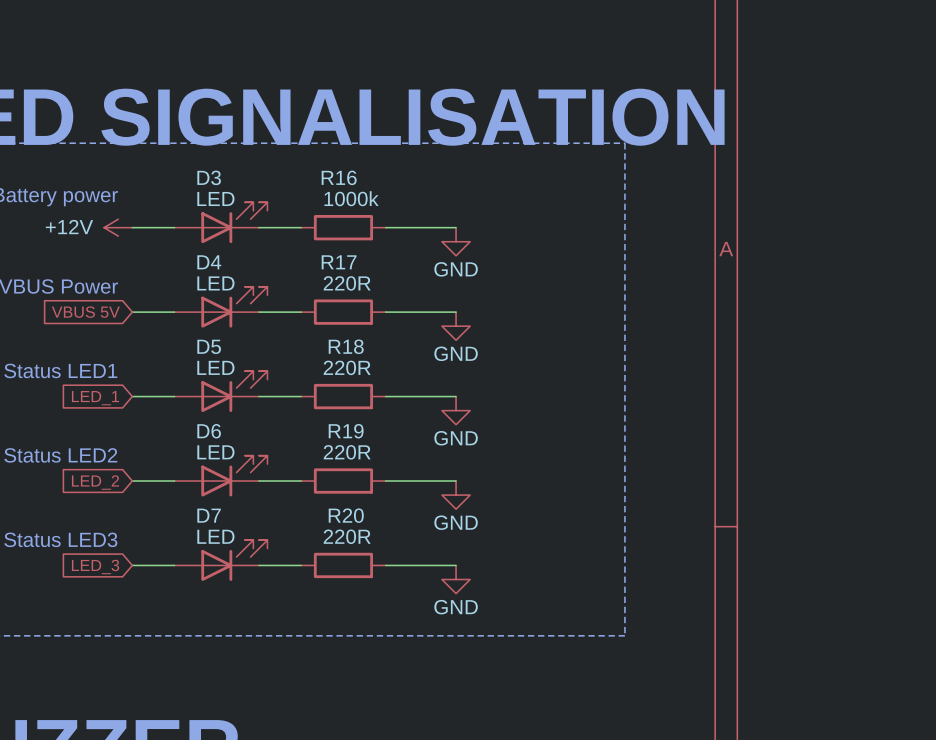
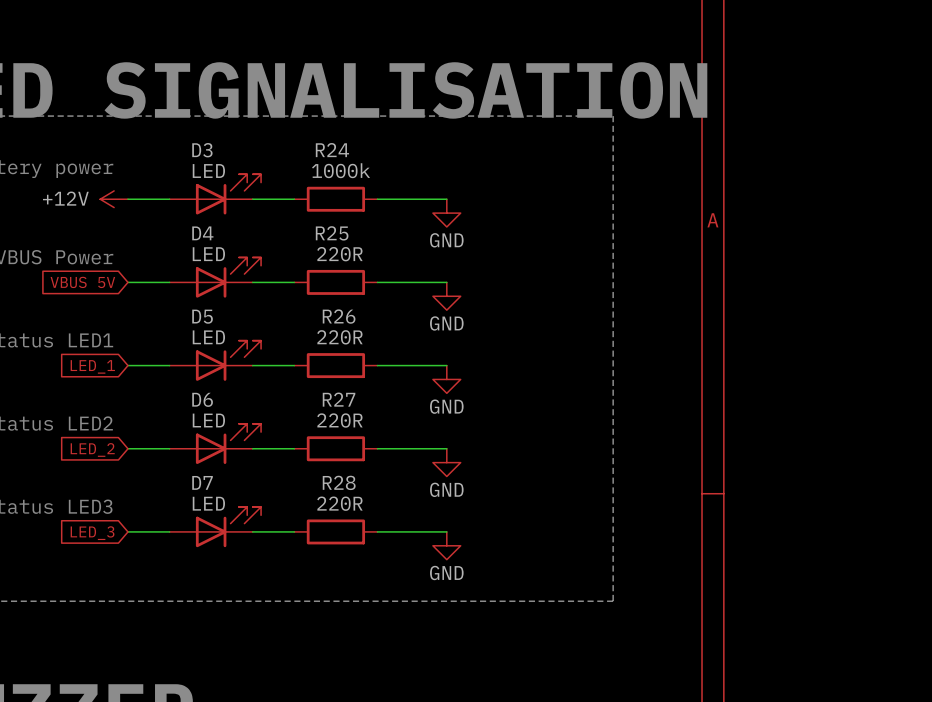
R16 name: R16 (339, 177) -> R24 (332, 150)
R17 name: R17 (339, 262) -> R25 (332, 233)
R18 name: R18 (346, 346) -> R26 (339, 316)
R19 name: R19 (346, 431) -> R27 (339, 399)
R20 name: R20 (346, 515) -> R28 (339, 482)

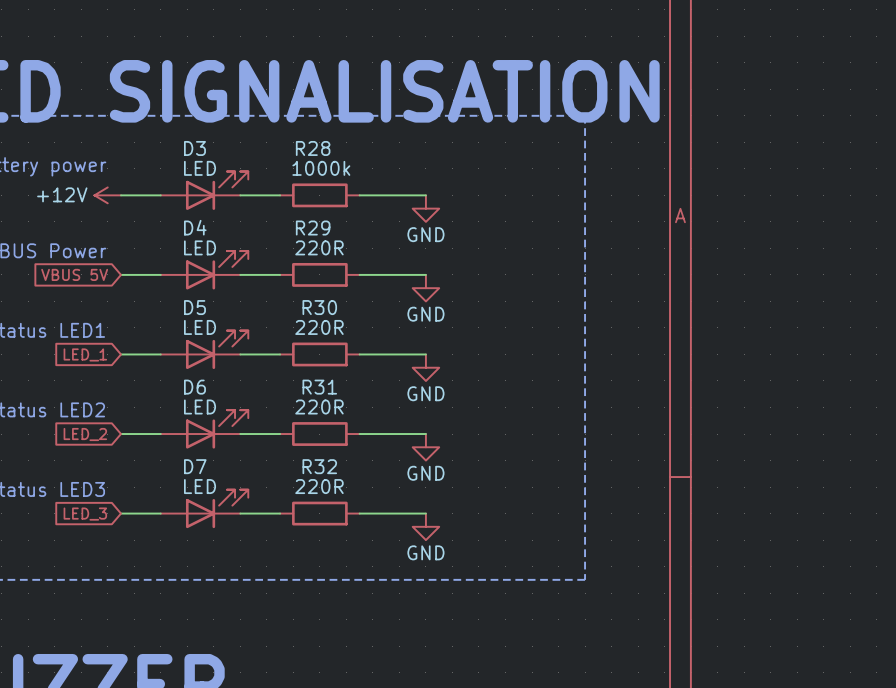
R24 name: R24 (332, 150) -> R28 (313, 148)
R25 name: R25 (332, 233) -> R29 (313, 228)
R26 name: R26 (339, 316) -> R30 (319, 307)
R27 name: R27 (339, 399) -> R31 (319, 387)
R28 name: R28 (339, 482) -> R32 (319, 466)

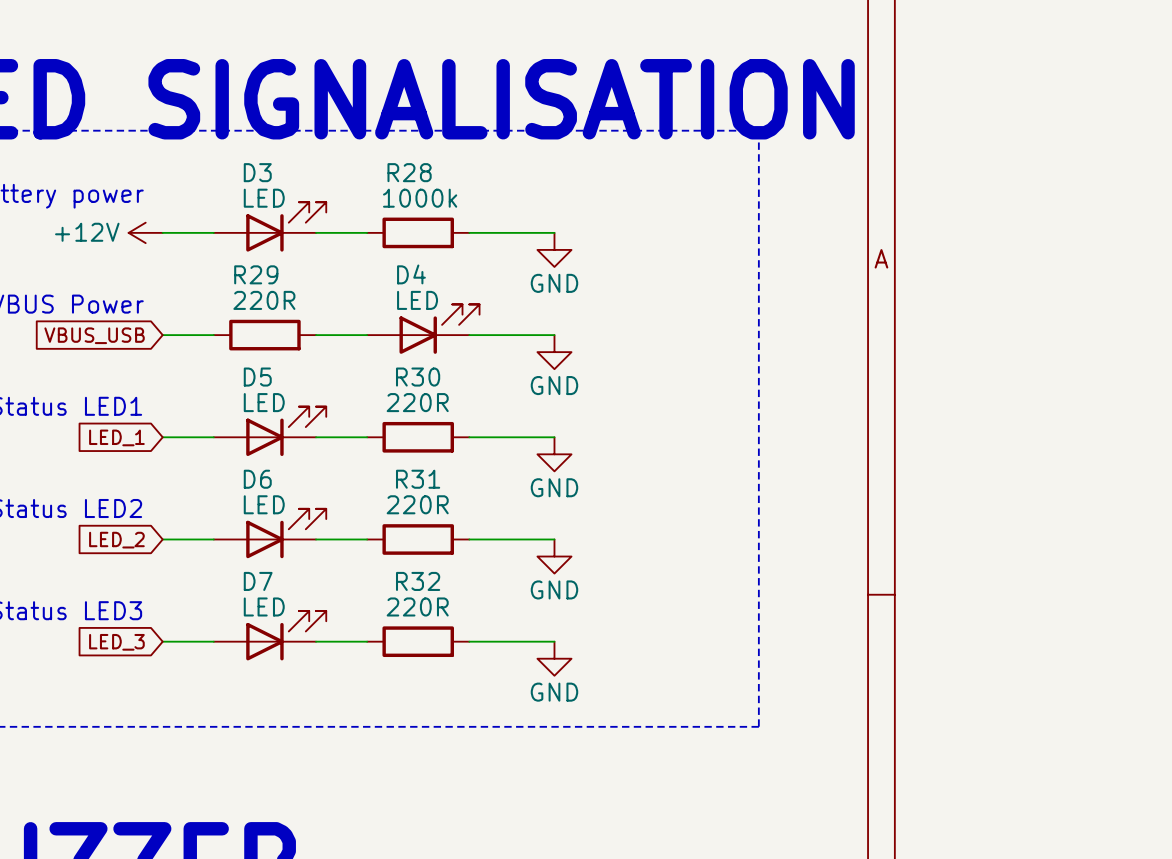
D4 position: (204, 270) -> (423, 329)
global label: VBUS 5V (74, 274) -> VBUS_USB (94, 335)
R29 position: (319, 274) -> (264, 335)

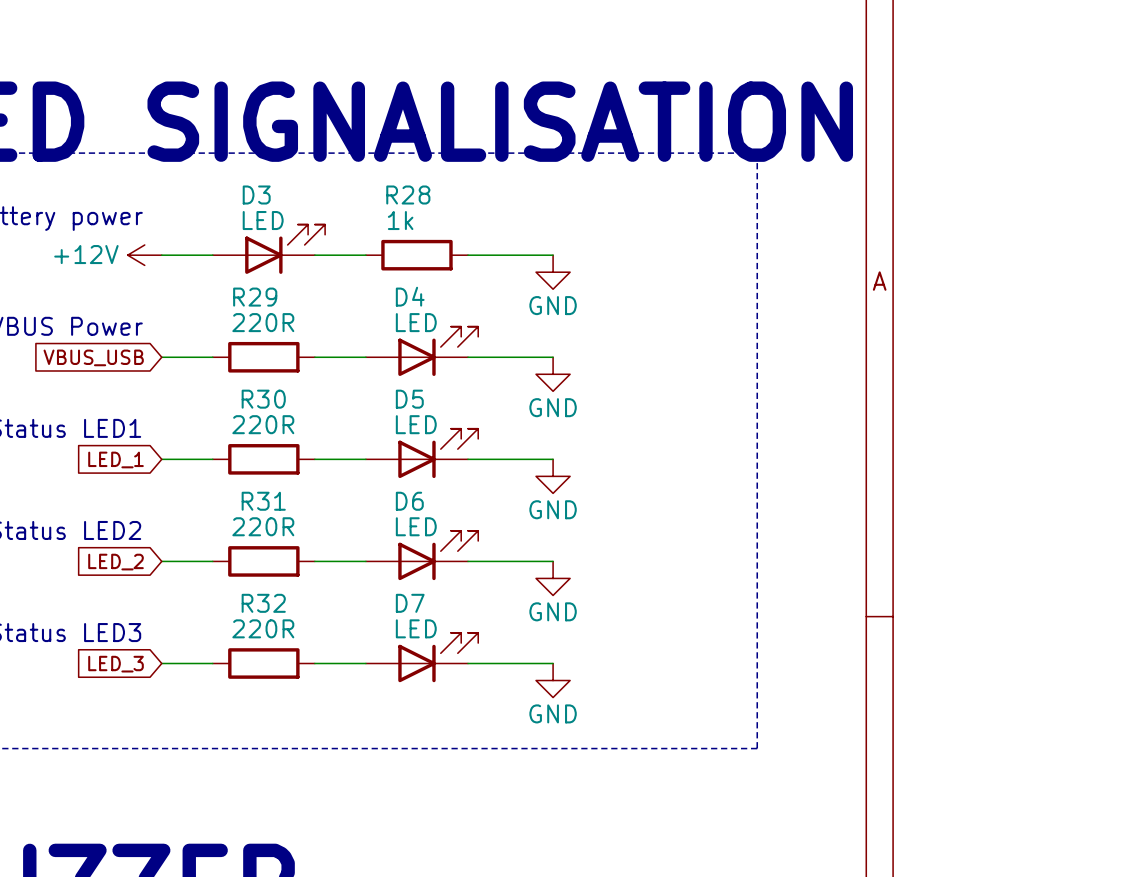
R28 value: 1000k (420, 198) -> 1k (400, 220)
D5 position: (270, 431) -> (422, 453)
R30 position: (418, 437) -> (263, 459)
D6 position: (270, 533) -> (422, 555)
R31 position: (418, 539) -> (263, 561)
D7 position: (270, 635) -> (422, 657)
R32 position: (418, 641) -> (263, 663)

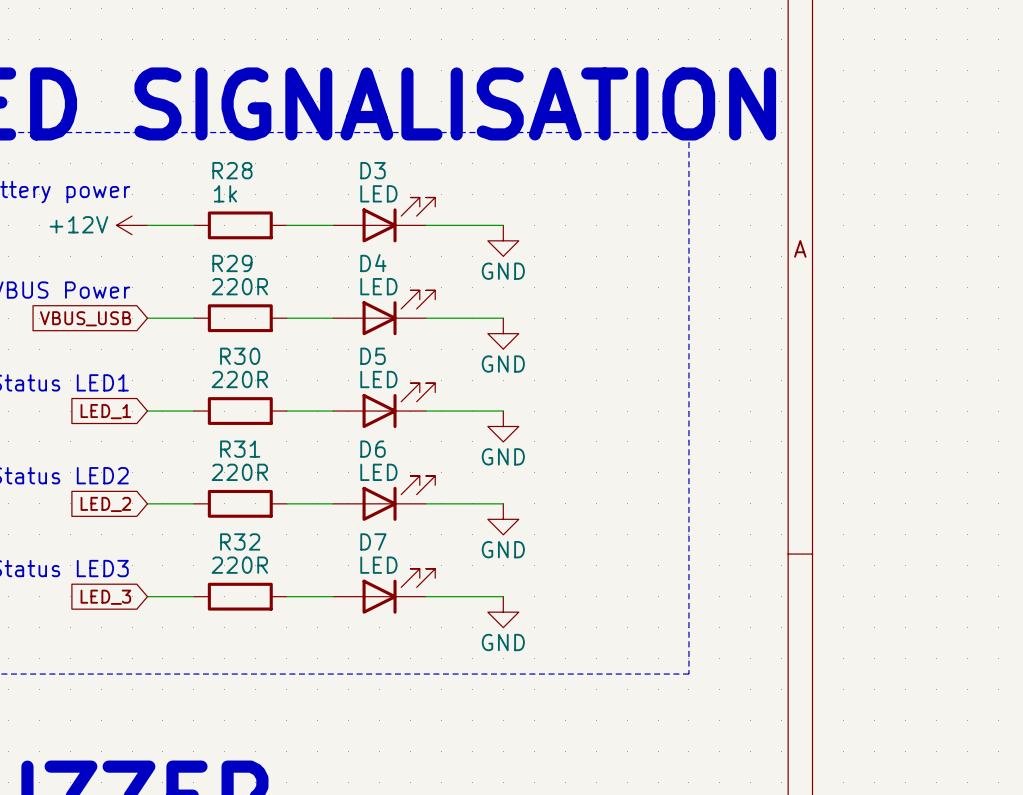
D3 position: (268, 249) -> (384, 219)
R28 position: (416, 255) -> (240, 225)

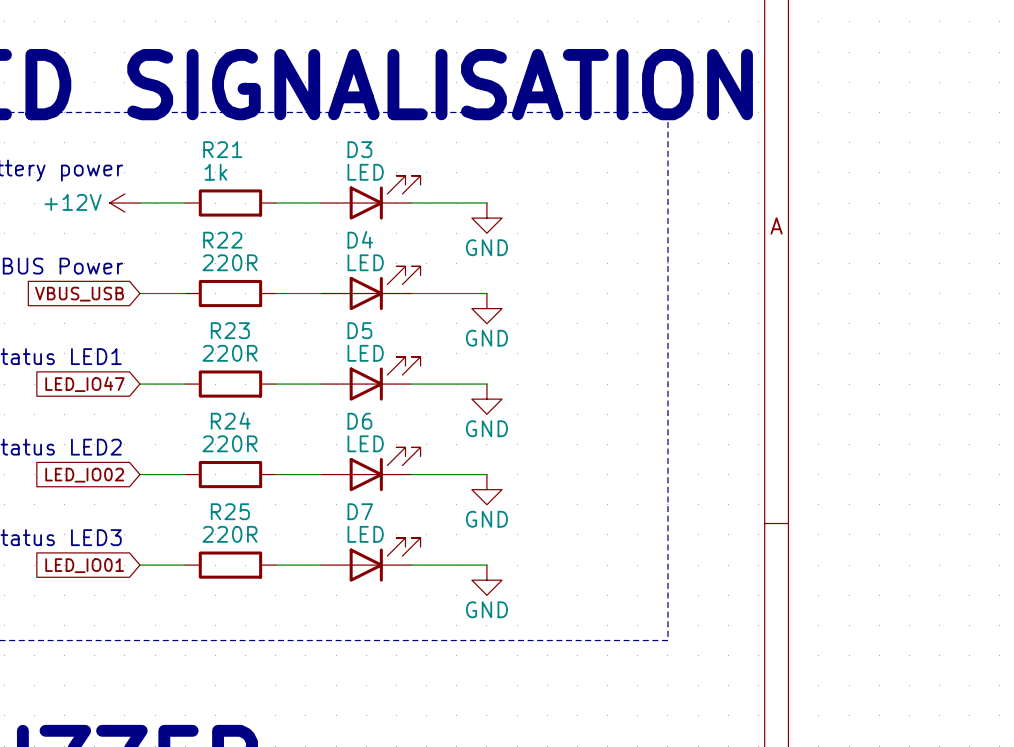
R28 name: R28 (232, 170) -> R21 (222, 149)
R29 name: R29 (232, 263) -> R22 (222, 240)
R30 name: R30 (240, 356) -> R23 (230, 330)
global label: LED_1 (105, 411) -> LED_IO47 (84, 384)
R31 name: R31 (240, 449) -> R24 (230, 420)
global label: LED_2 (105, 504) -> LED_IO02 (84, 475)
R32 name: R32 (240, 541) -> R25 (230, 511)
global label: LED_3 (105, 597) -> LED_IO01 (84, 565)

